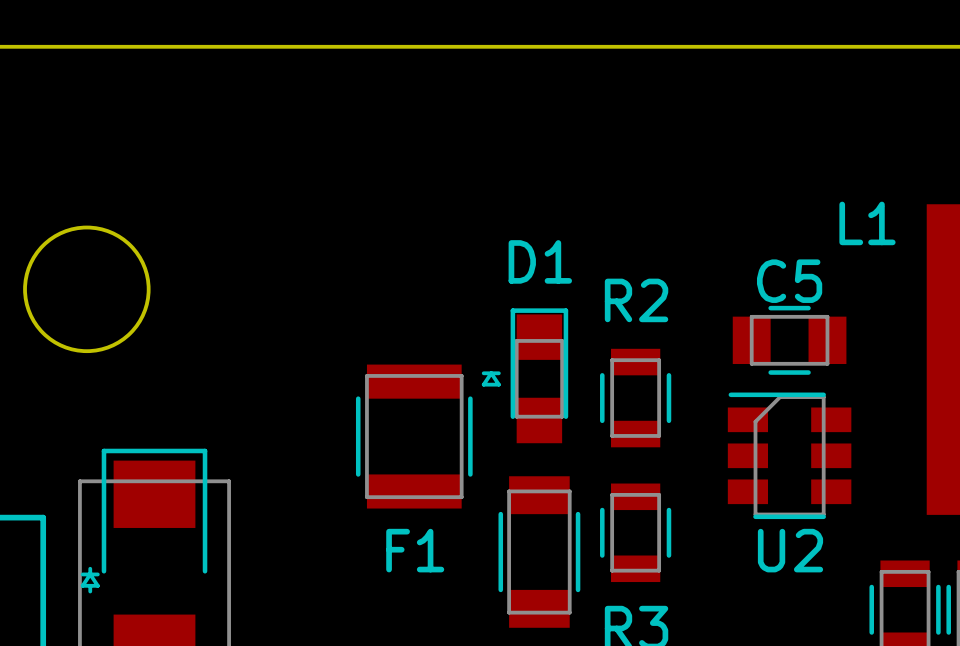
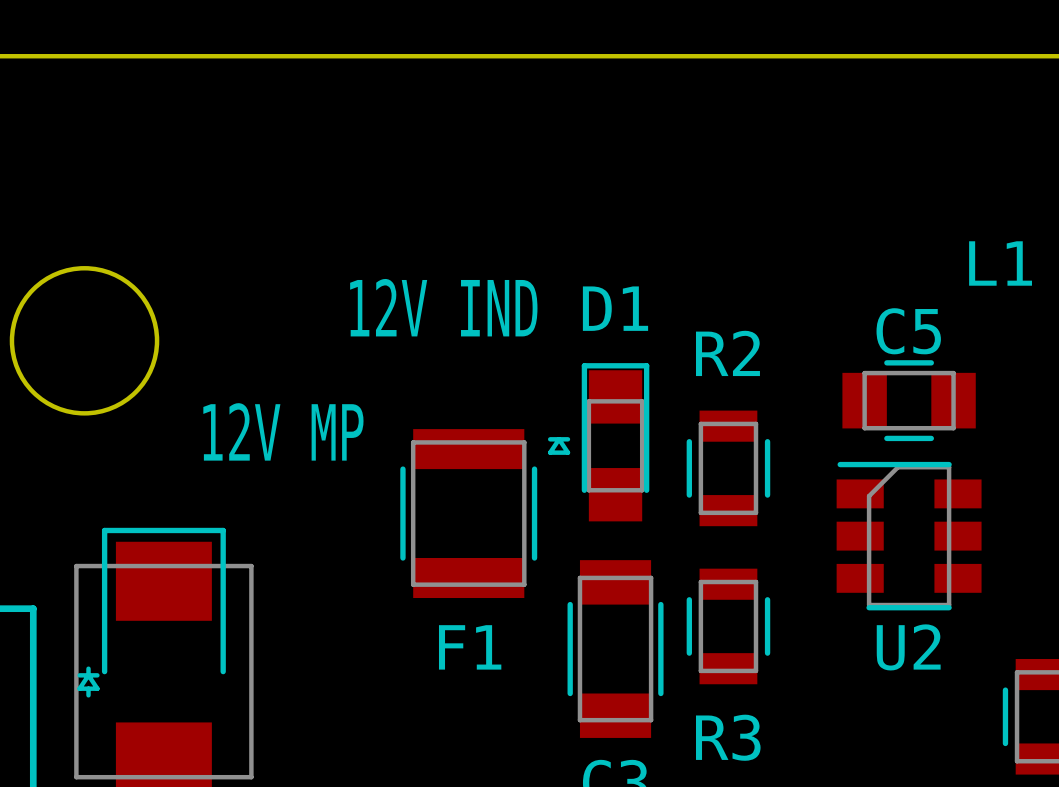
text: none -> 12V IND (443, 307)
text: none -> 12V MP (283, 431)

